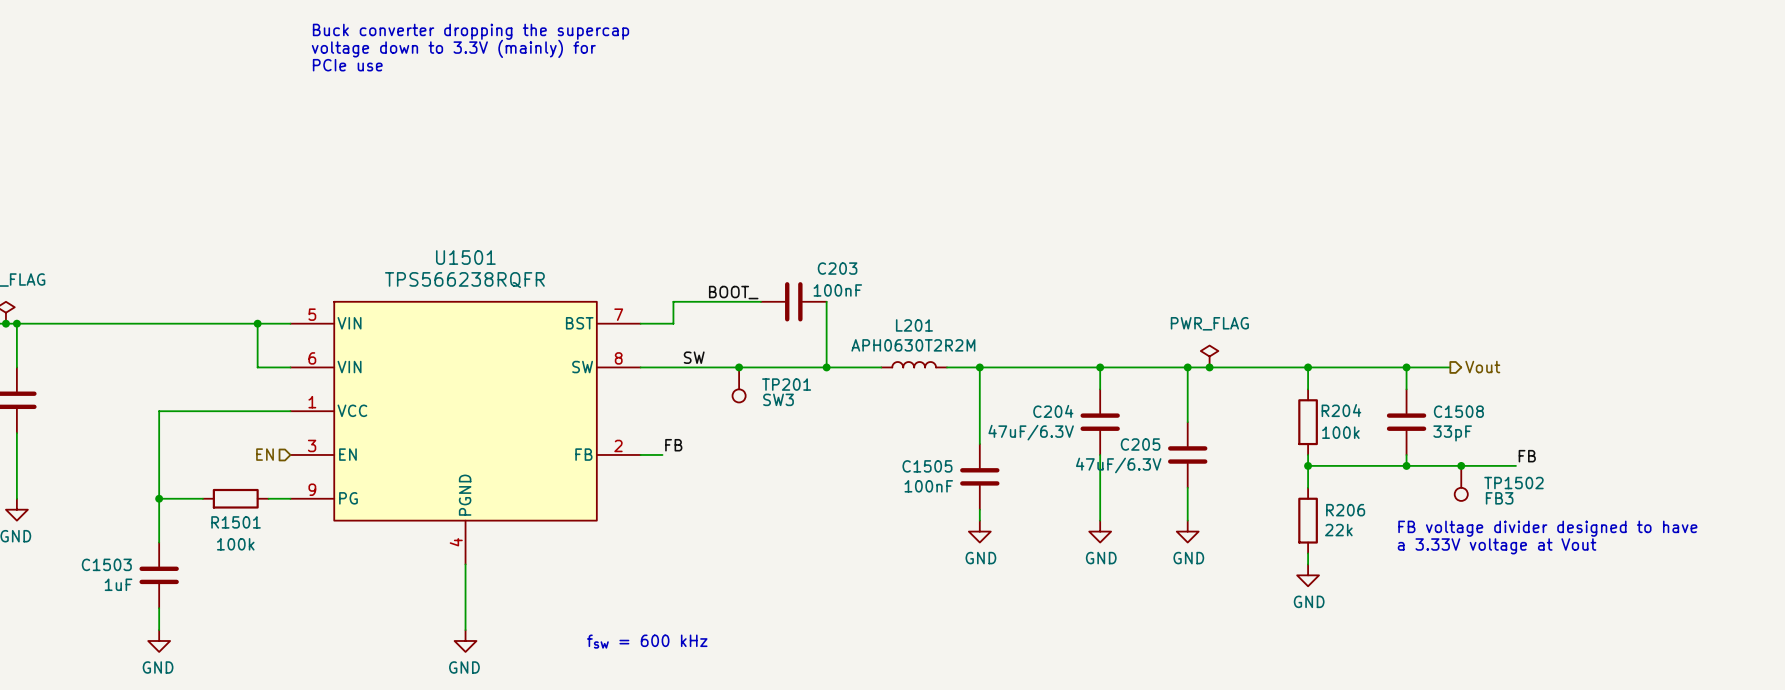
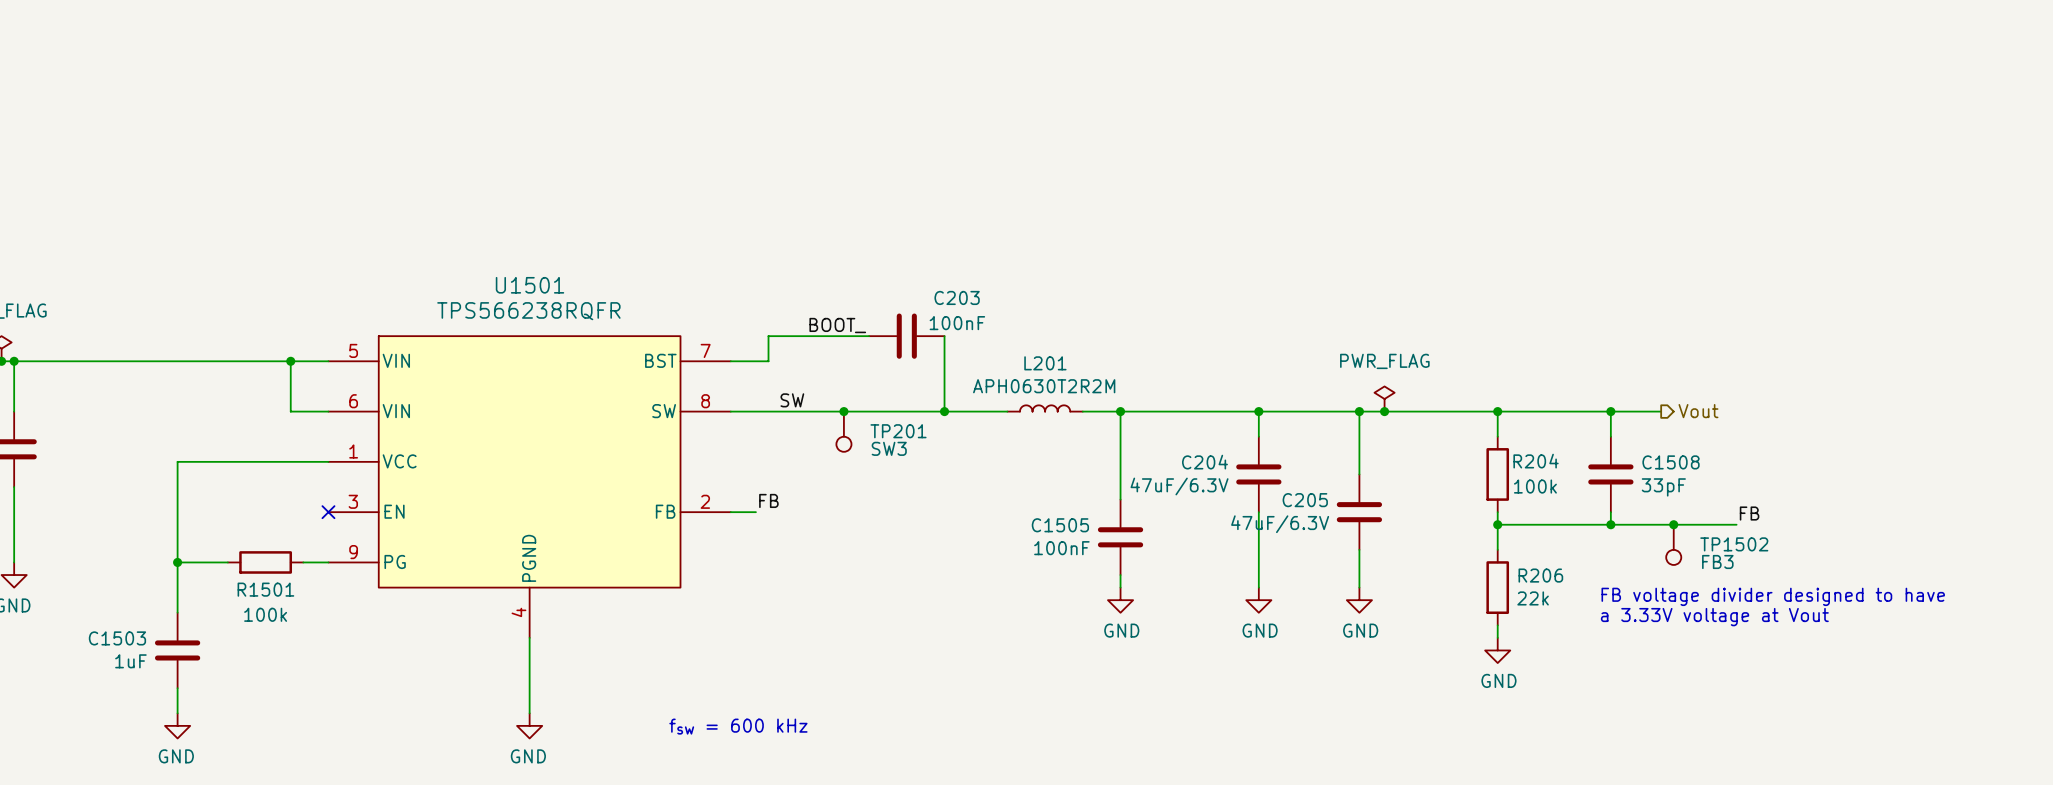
text: Buck converter dropping the supercap (470, 31) -> none
text: voltage down to 3.3V (mainly) for (453, 48) -> none
text: PCIe use (347, 65) -> none
hierarchical label: EN (265, 454) -> none
no-connect mark: none -> (328, 512)

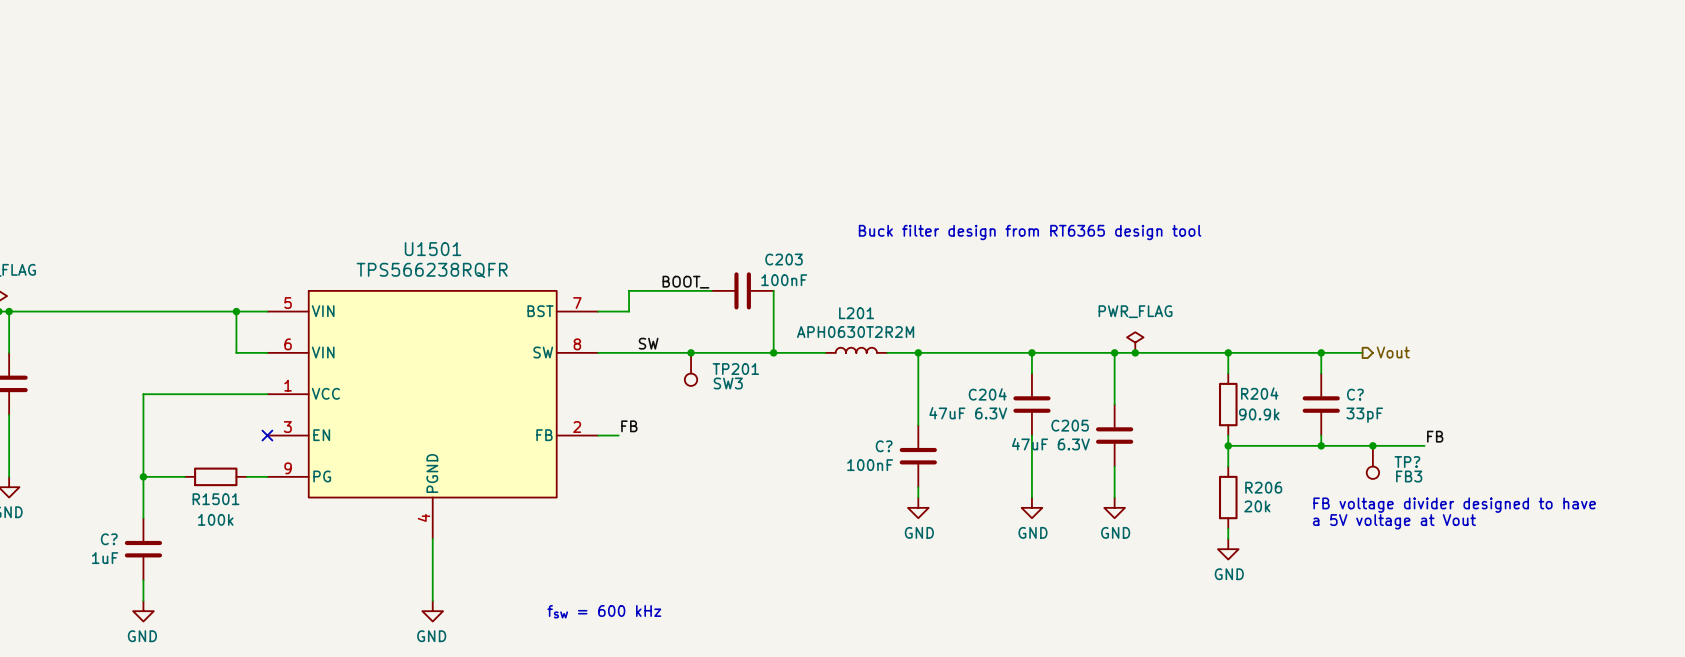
text: none -> Buck filter design from RT6365 design tool (1030, 232)
C1508 name: C1508 (1671, 462) -> C? (1355, 394)
C204 value: 47uF/6.3V (1179, 486) -> 47uF 6.3V (968, 413)
R204 value: 100k (1535, 486) -> 90.9k (1259, 414)
C205 value: 47uF/6.3V (1280, 524) -> 47uF 6.3V (1050, 444)
C1505 name: C1505 (1060, 525) -> C? (884, 446)
TP1502 name: TP1502 (1734, 544) -> TP? (1407, 462)
R206 value: 22k (1533, 598) -> 20k (1257, 506)
text: a 3.33V voltage at Vout (1714, 617) -> a 5V voltage at Vout (1394, 521)
C1503 name: C1503 (117, 638) -> C? (109, 539)

